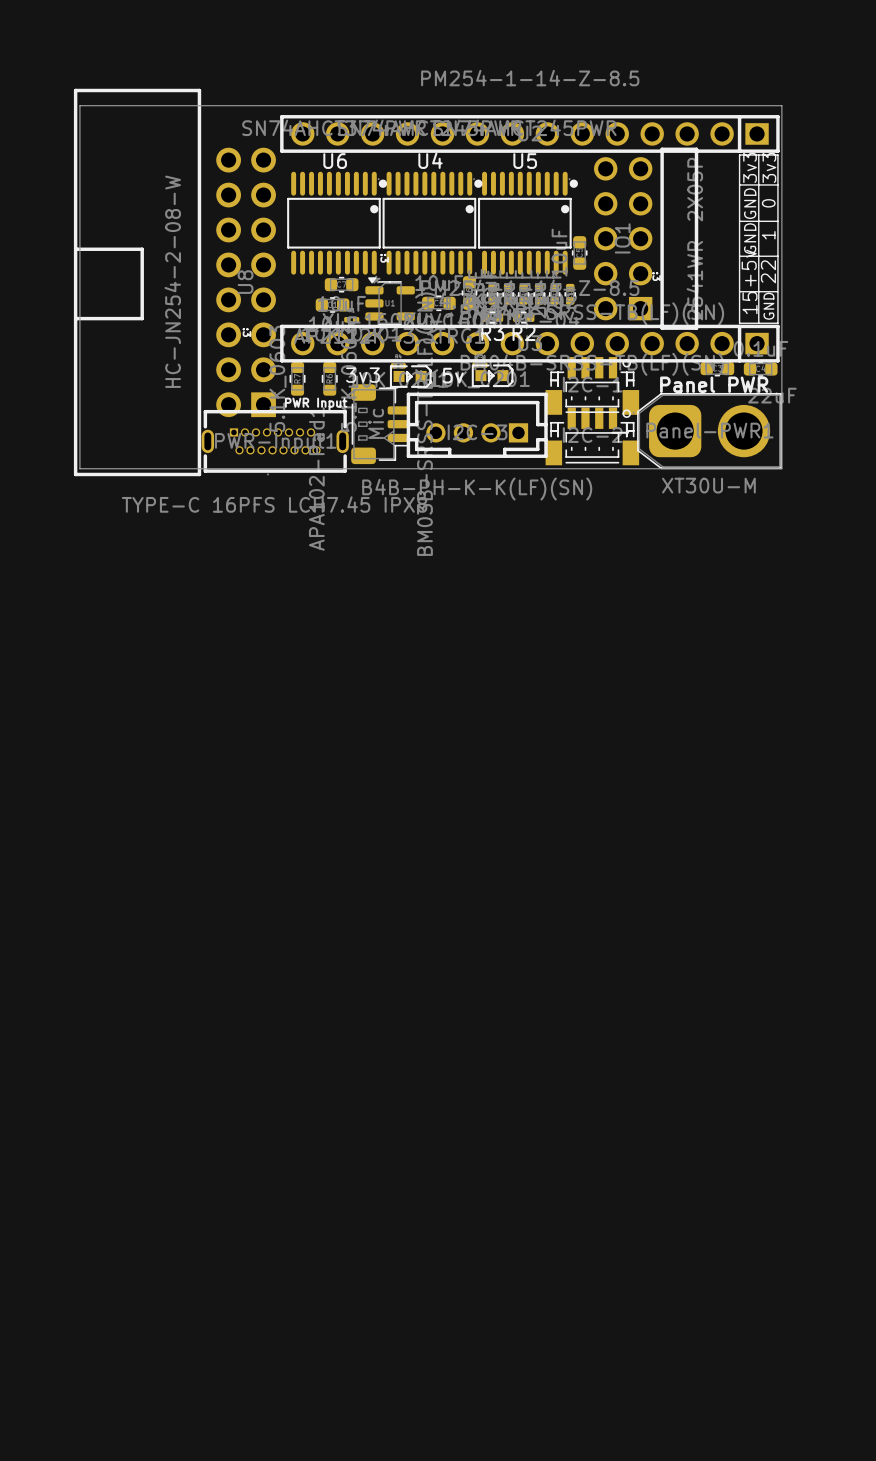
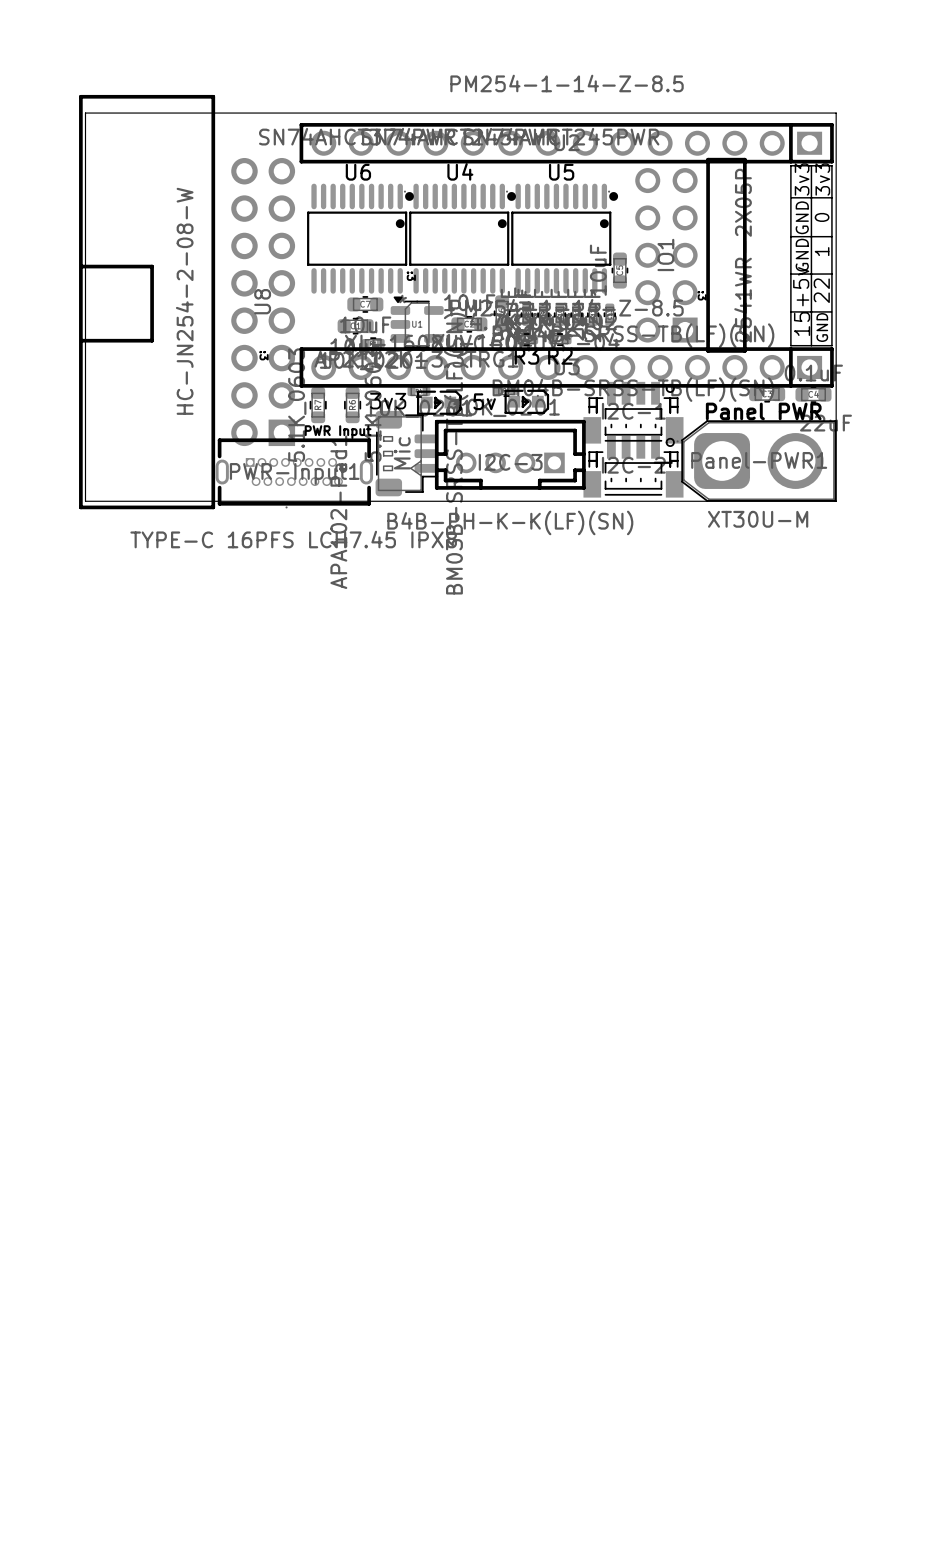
part footprint: [344, 317, 360, 323] -> [361, 337, 385, 351]
part footprint: [472, 362, 488, 368] -> [495, 384, 518, 397]
part footprint: [390, 363, 406, 369] -> [407, 384, 431, 398]

